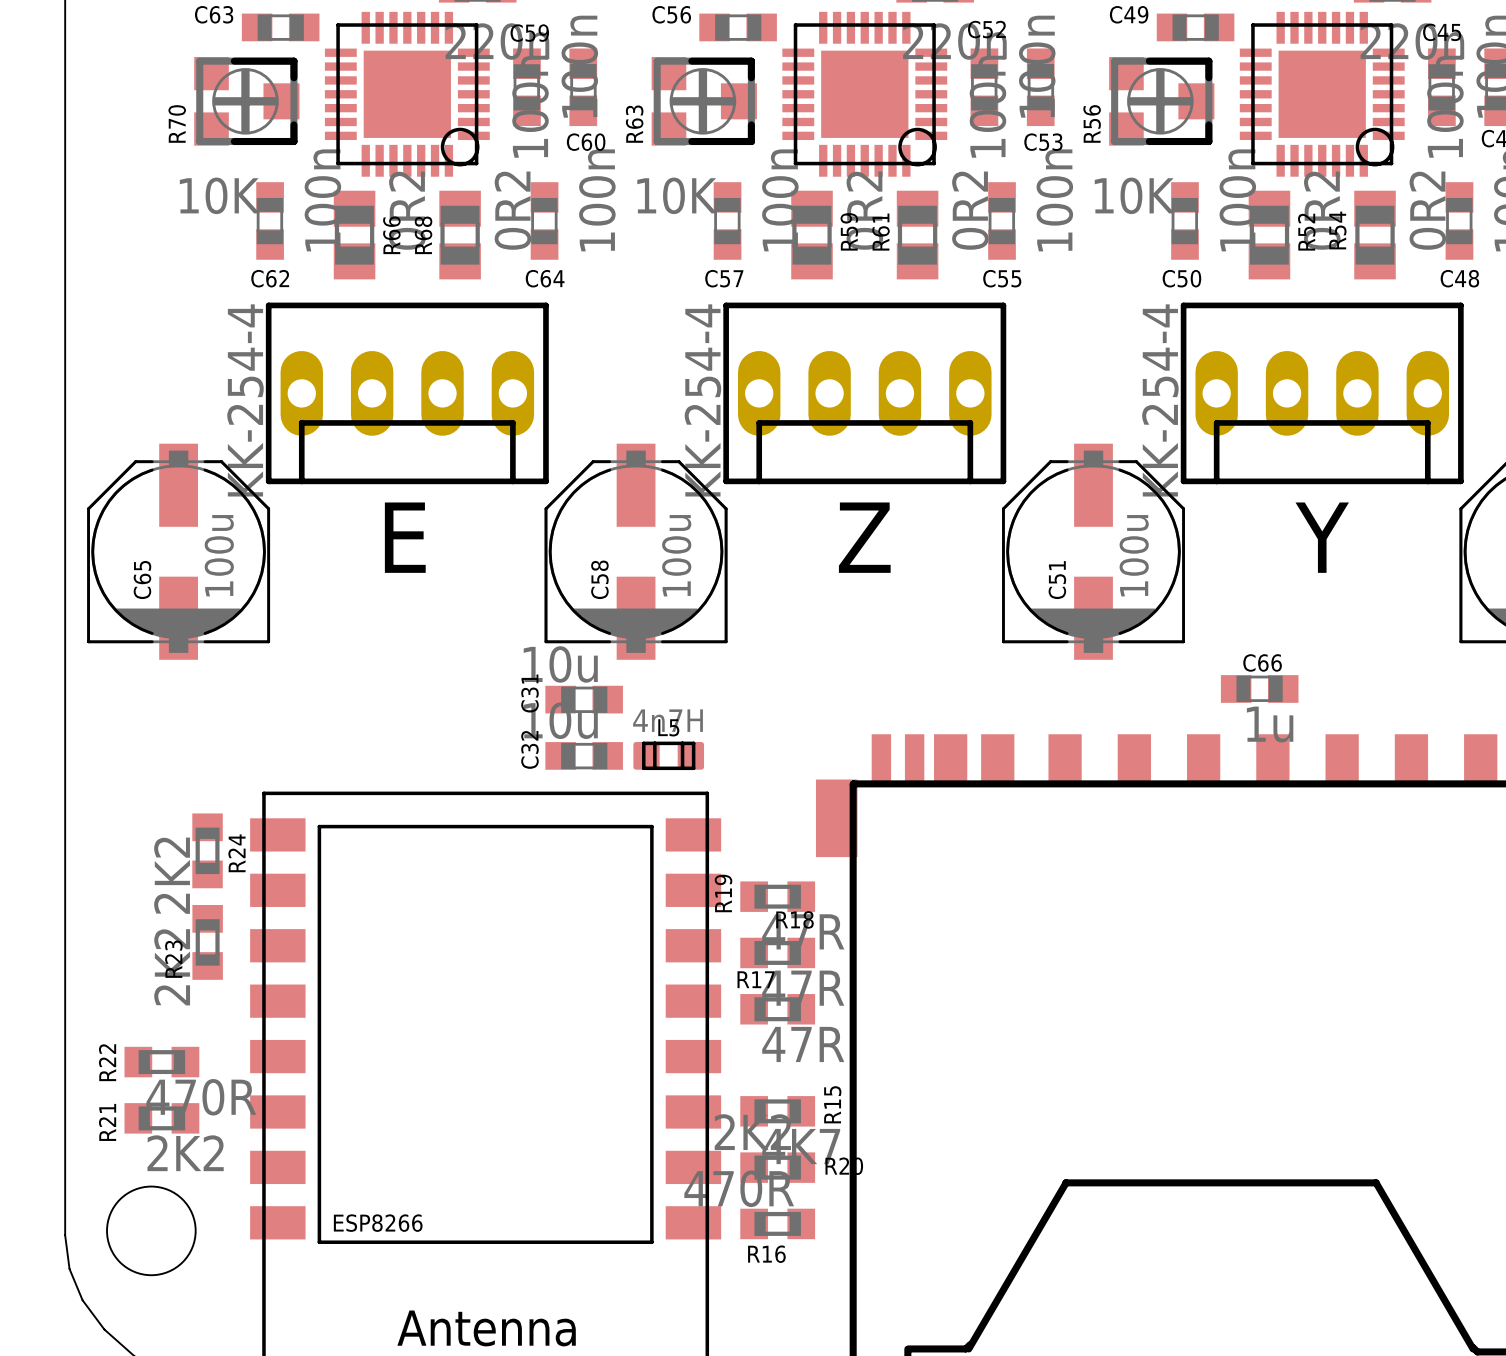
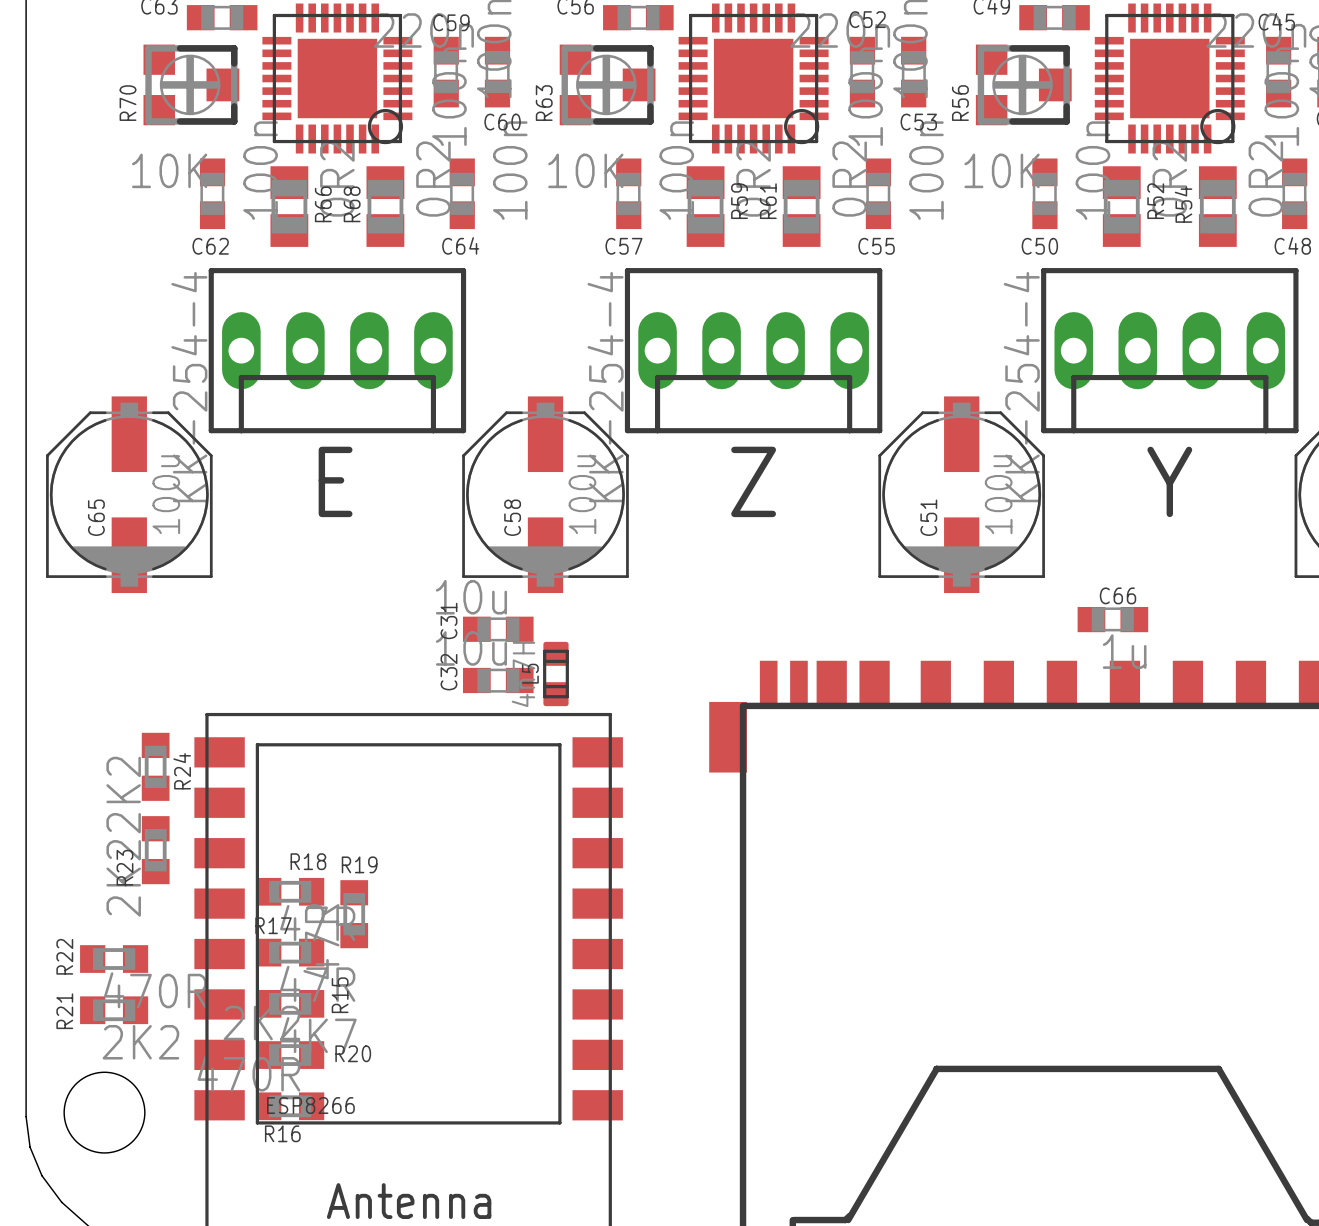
L5 rotation: 0° (668, 755) -> 90° clockwise (555, 674)
R19 rotation: 0° (777, 896) -> 90° clockwise (354, 914)
R19 position: (777, 896) -> (354, 914)
R18 position: (777, 952) -> (290, 891)
R17 position: (777, 1009) -> (290, 952)
R15 position: (777, 1111) -> (290, 1003)
R20 position: (777, 1167) -> (290, 1055)
R16 position: (777, 1223) -> (290, 1106)

